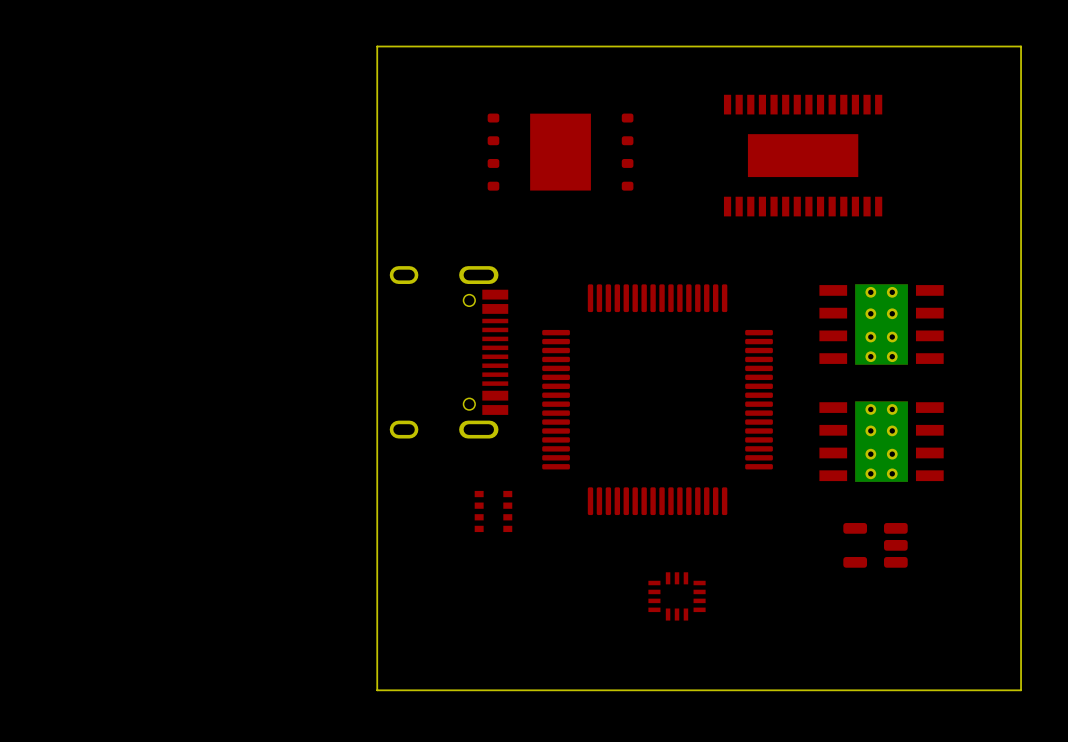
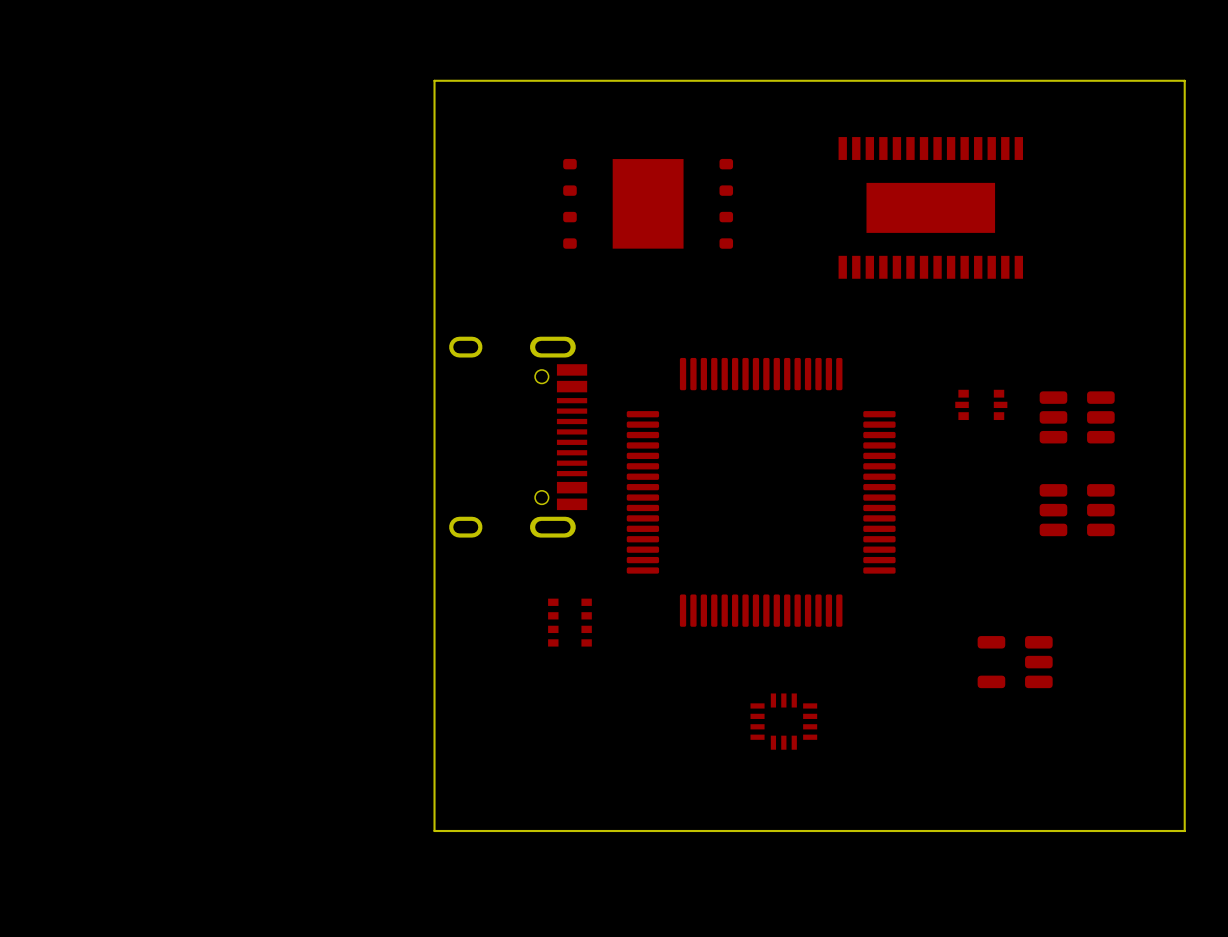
part: none -> (981, 404)
part: (881, 324) -> none
part: none -> (1077, 417)
part: none -> (1077, 510)
part: (881, 441) -> none

